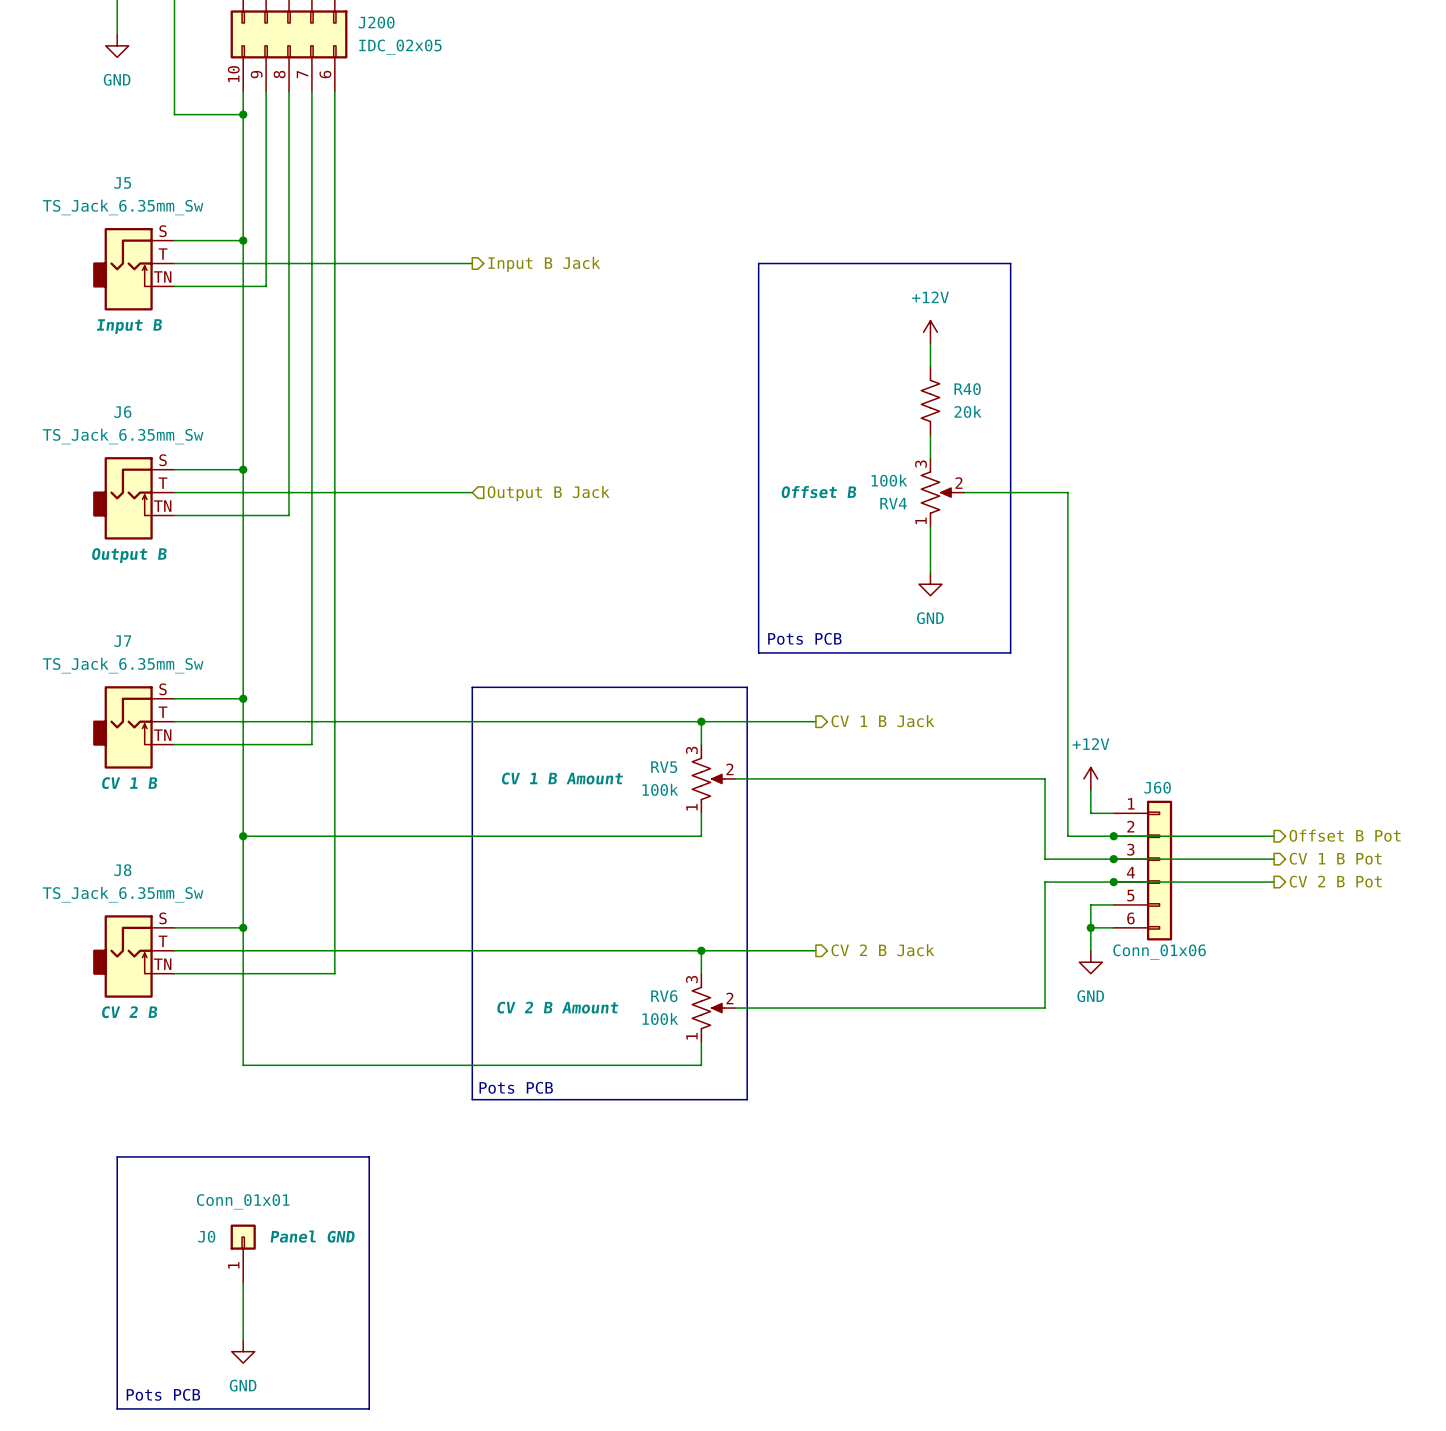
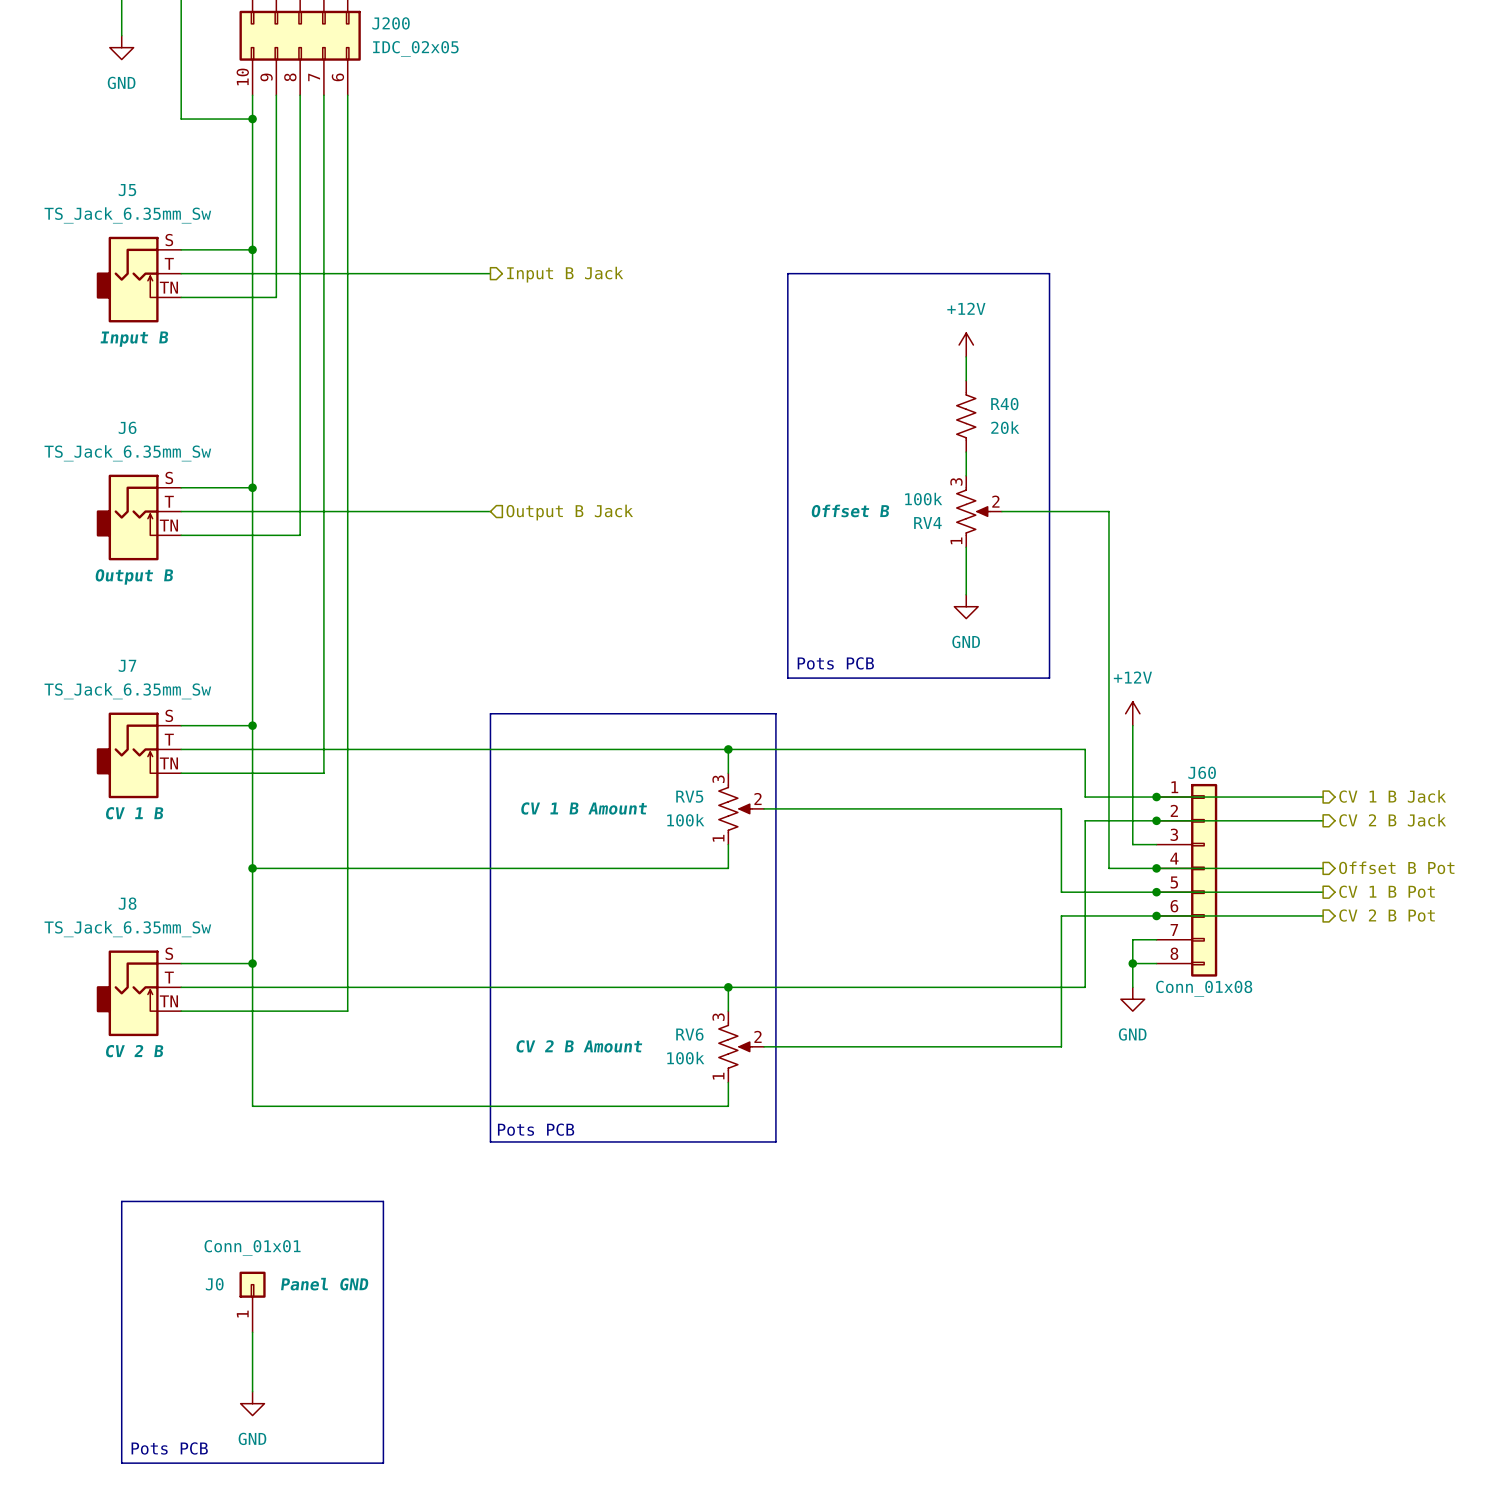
wire: none -> (1132, 725) (1132, 820)
wire: none -> (847, 749) (1085, 749) (1085, 797) (1323, 797)
hierarchical label: CV 1 B Jack (882, 721) -> none
hierarchical label: none -> CV 1 B Jack (1392, 796)
junction: none -> (1156, 797)
wire: (1022, 778) (1045, 778) (1045, 790) -> (1323, 820) (1085, 820)
power symbol position: +12V (1090, 778) -> +12V (1132, 713)
J60 name position: J60 (1157, 787) -> J60 (1202, 772)
hierarchical label: none -> CV 2 B Jack (1392, 820)
junction: none -> (1156, 820)
J60 symbol: [1113, 800, 1173, 941] -> [1156, 783, 1218, 977]
wire: none -> (847, 987) (1085, 987)
hierarchical label: CV 2 B Jack (882, 950) -> none
wire: (1045, 950) (1045, 1008) (1022, 1008) -> (1061, 808) (1061, 892) (1085, 892) (1085, 915) (1061, 915) (1061, 1046)
J60 value: Conn_01x06 (1159, 952) -> Conn_01x08 (1204, 988)

